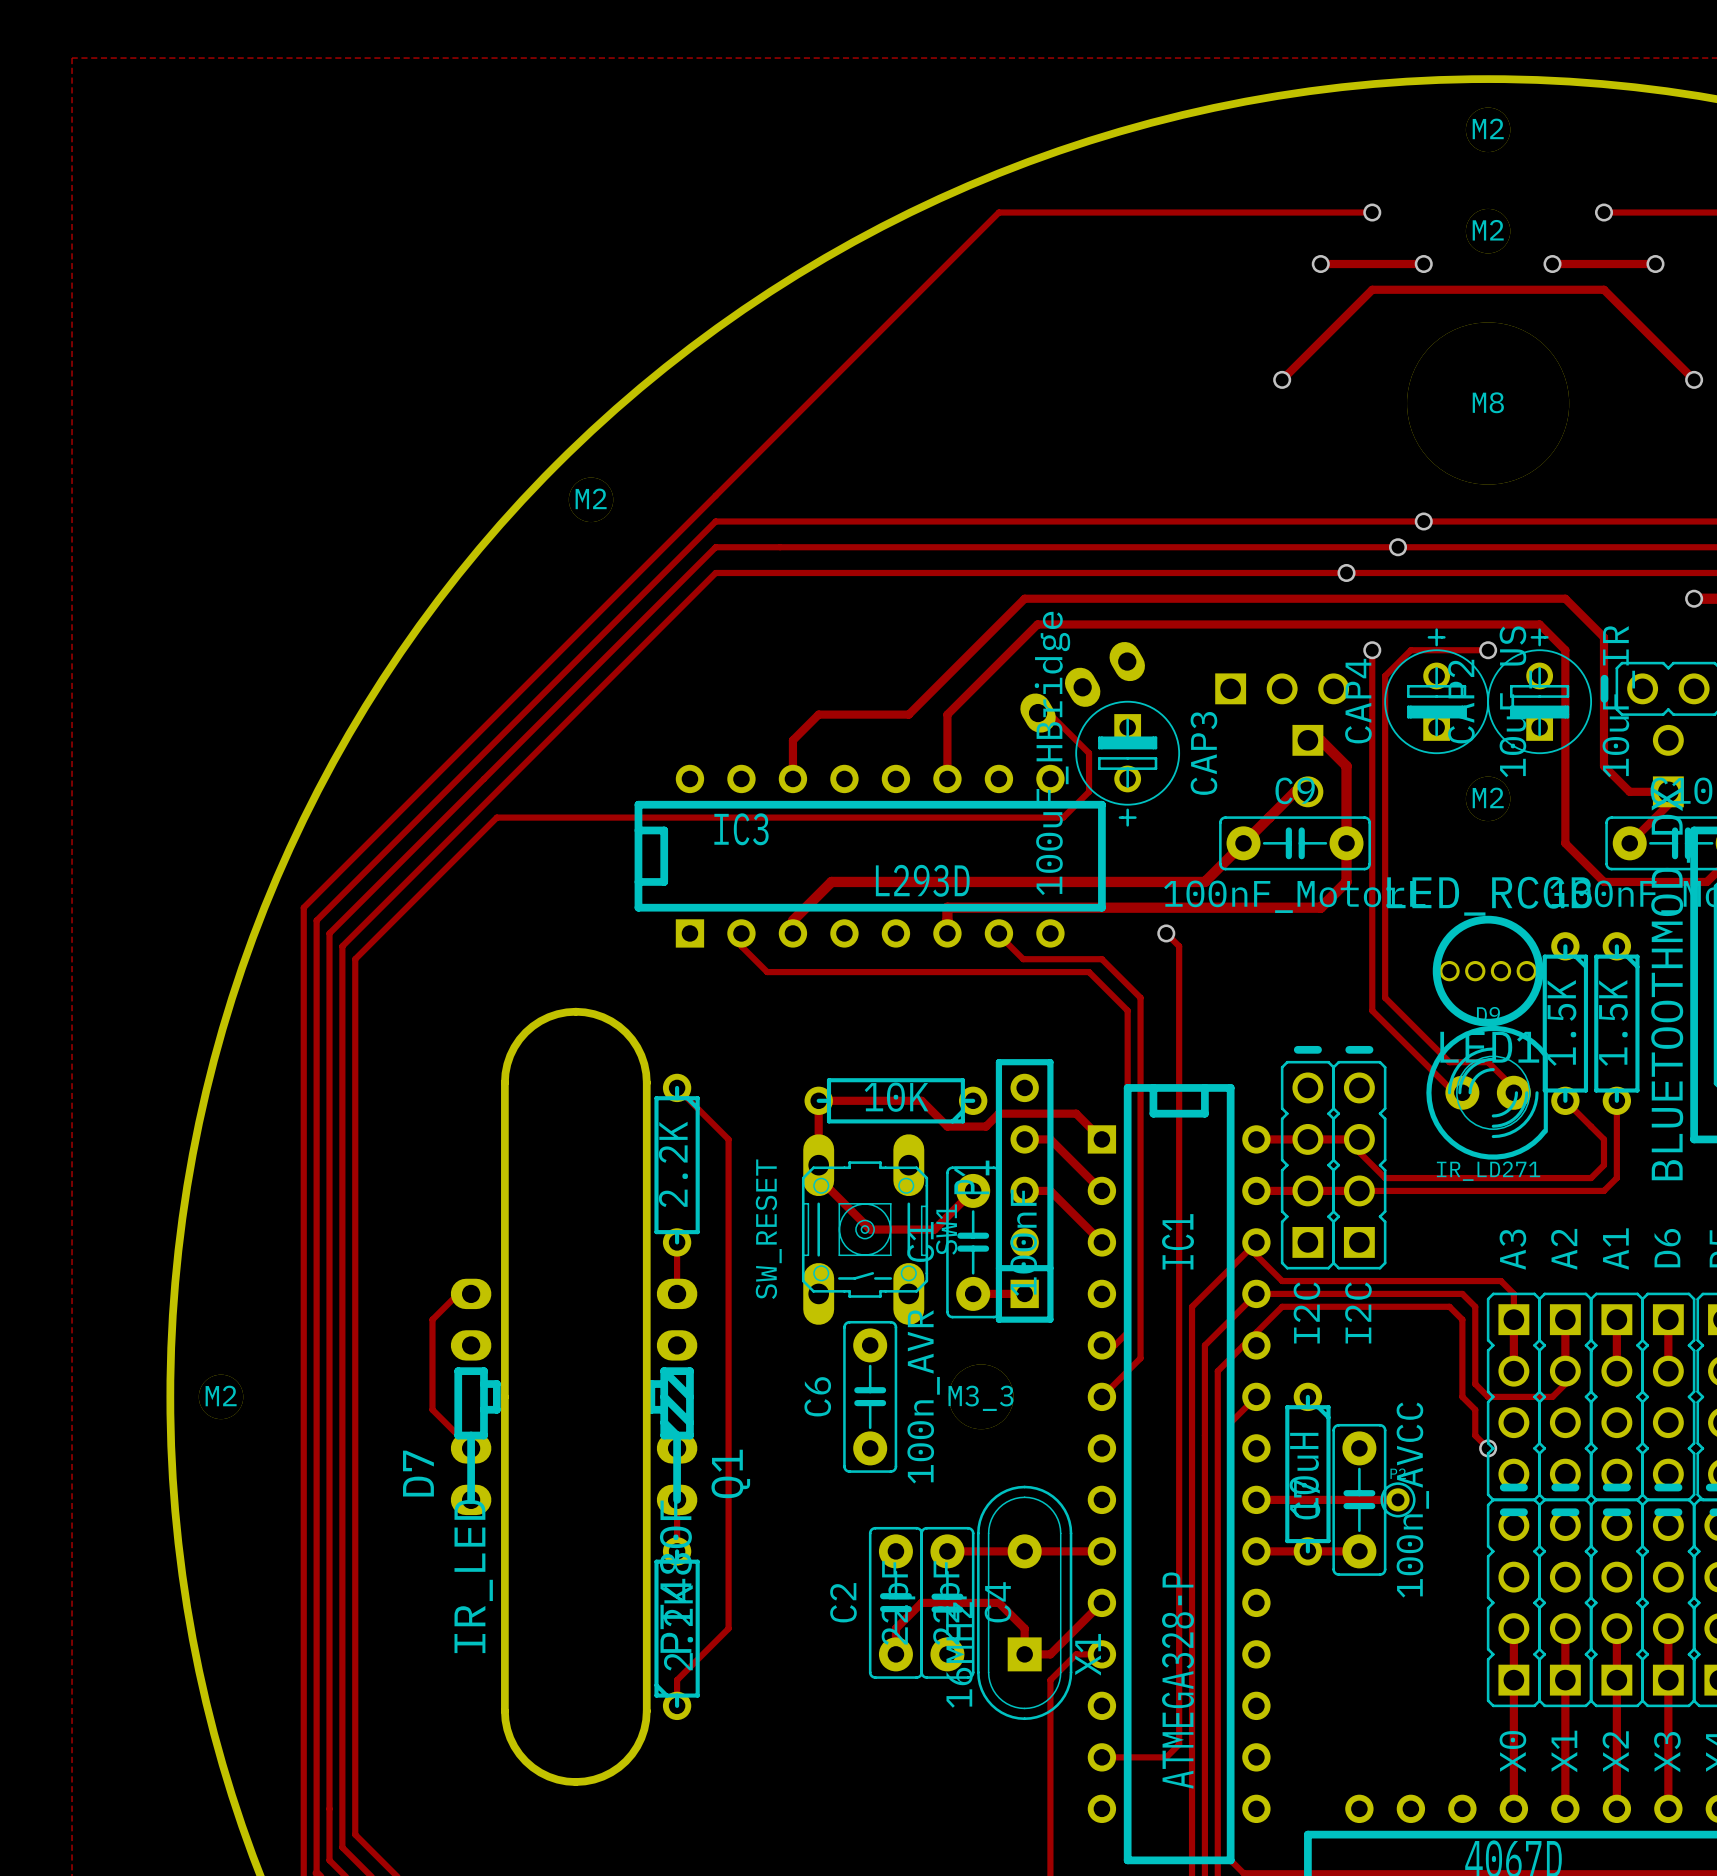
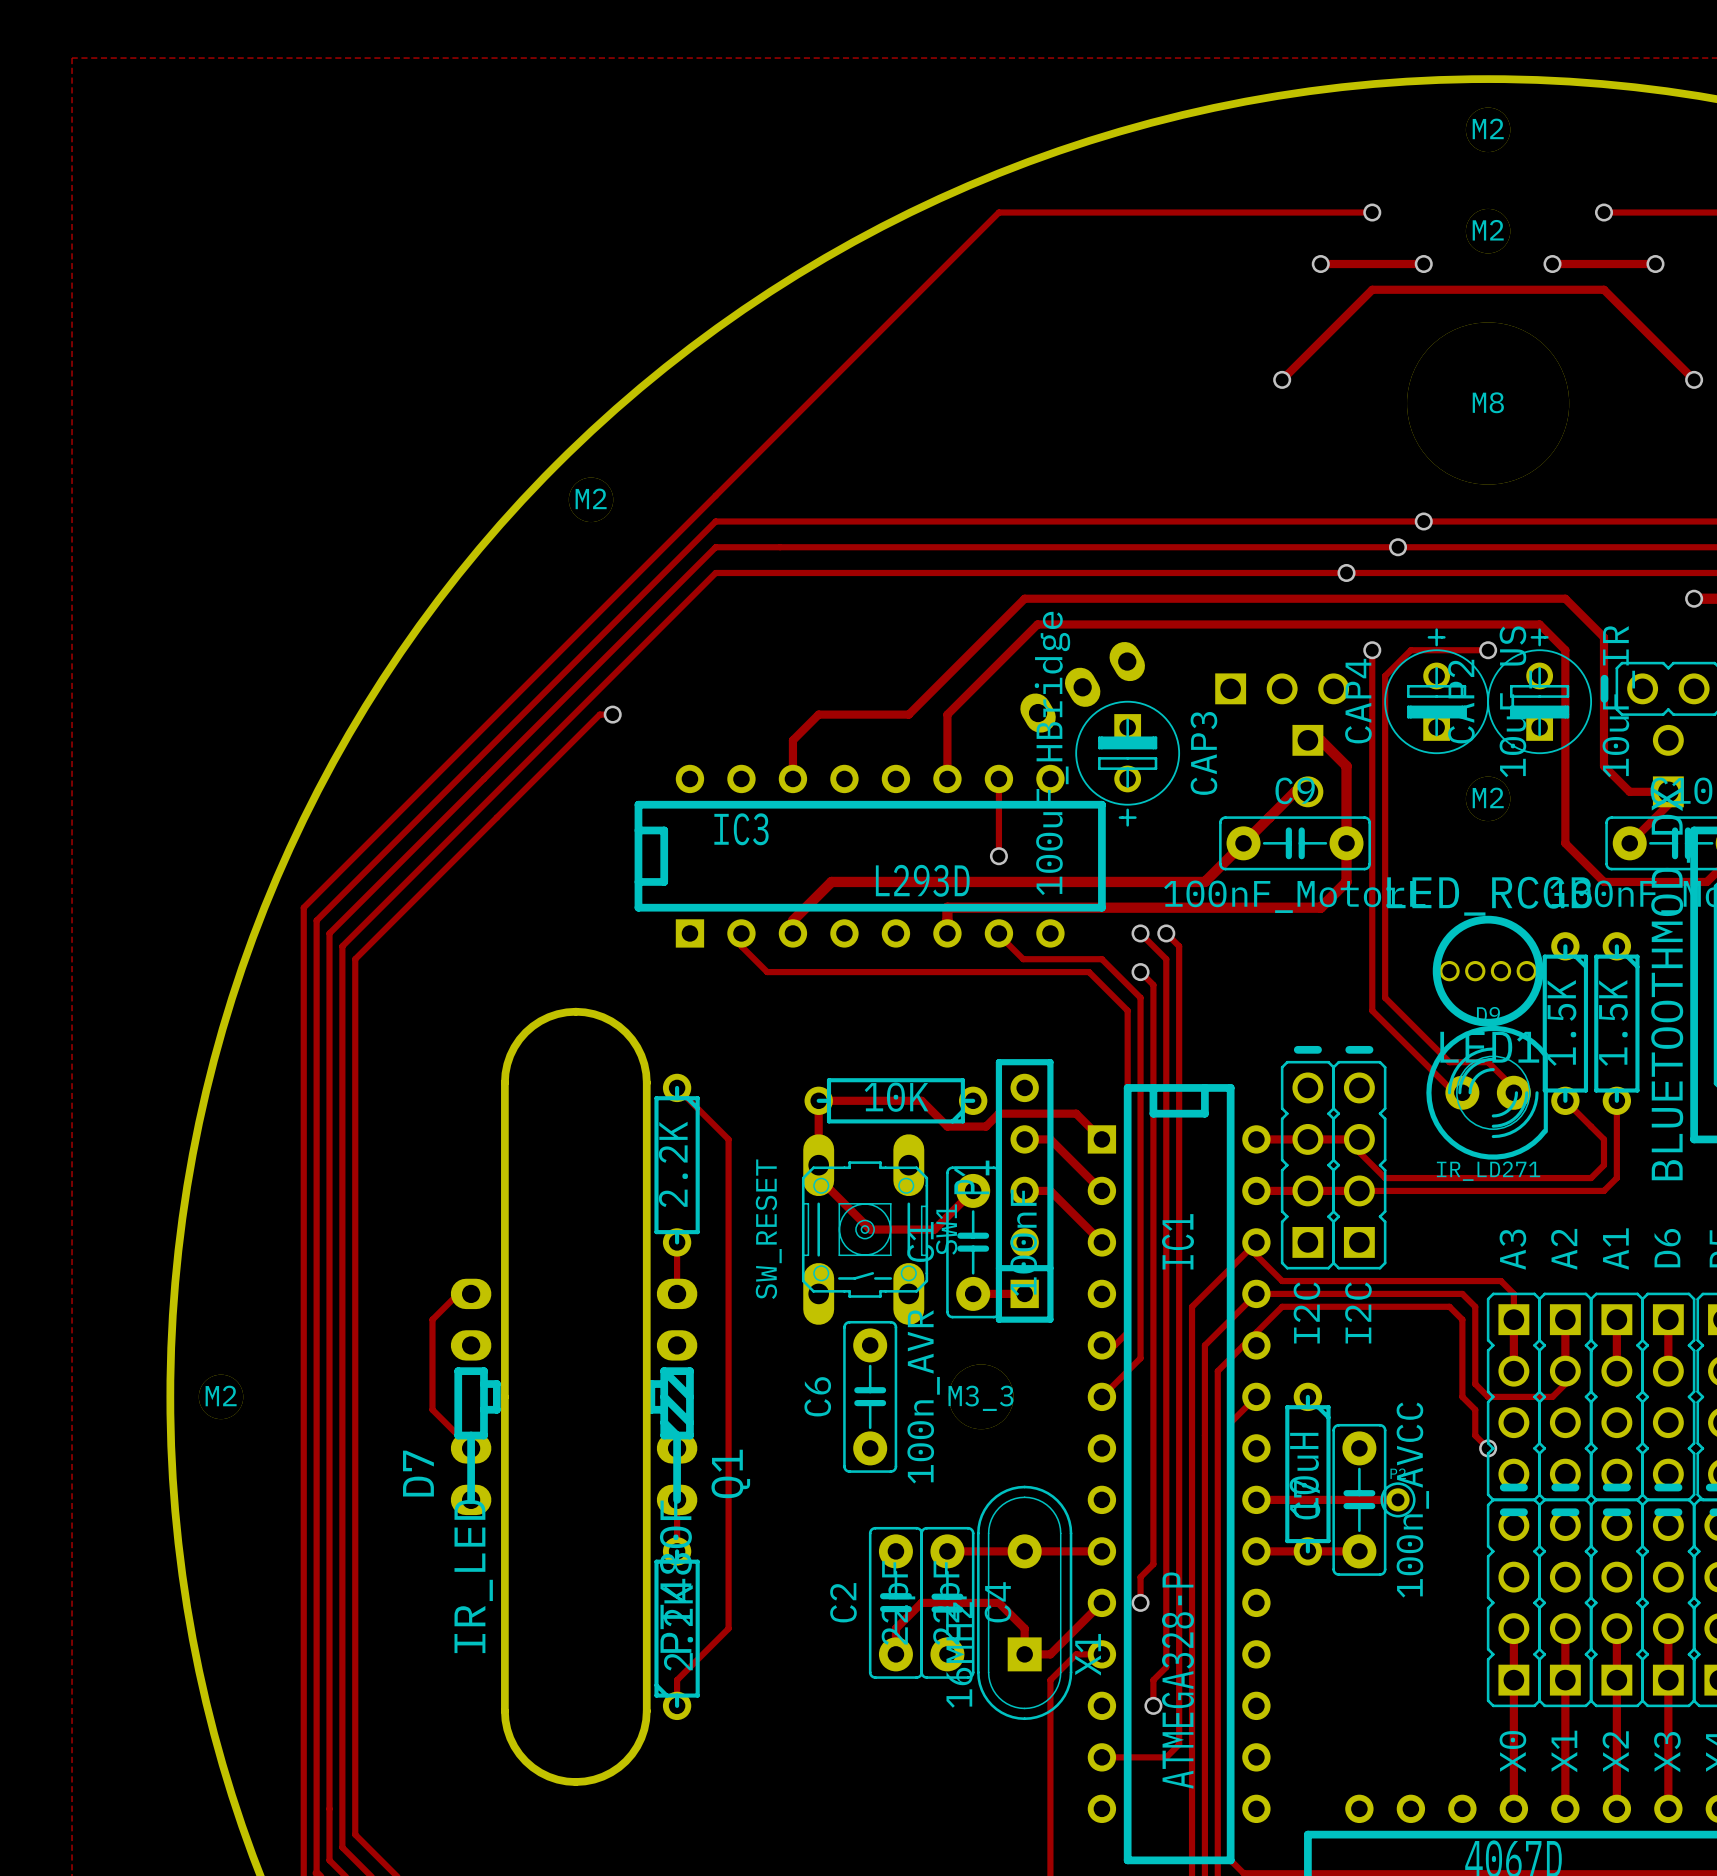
track: (1048, 713) (1089, 753) (1089, 791) (1063, 817) (496, 817) -> (612, 714) (599, 714) (496, 817)
via: none -> (612, 714)
track: none -> (998, 778) (998, 856)
via: none -> (998, 856)
track: none -> (1140, 933) (1166, 959) (1166, 1667) (1153, 1680) (1153, 1705)
via: none -> (1140, 933)
track: none -> (1140, 972) (1153, 984) (1153, 1564) (1140, 1577) (1140, 1602)
via: none -> (1140, 972)
via: none -> (1140, 1602)
via: none -> (1153, 1705)

